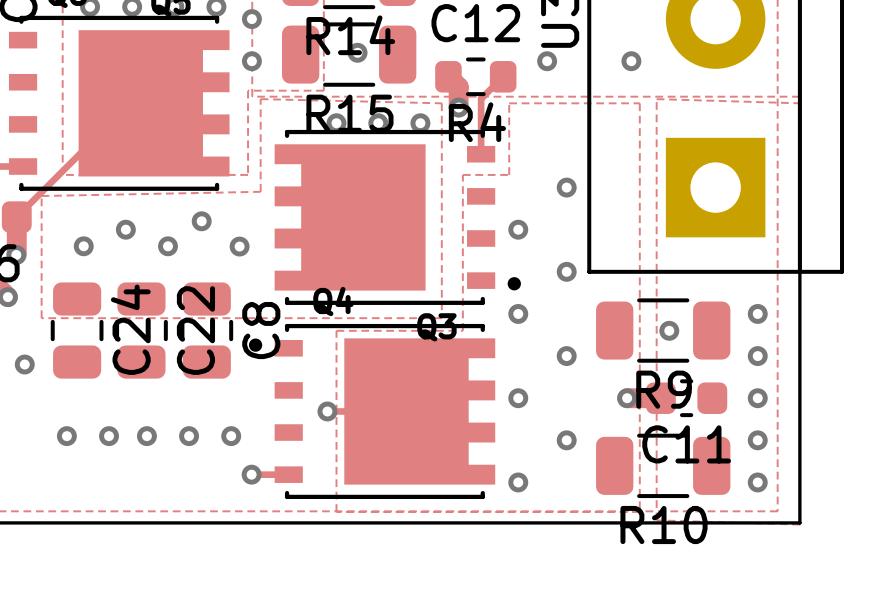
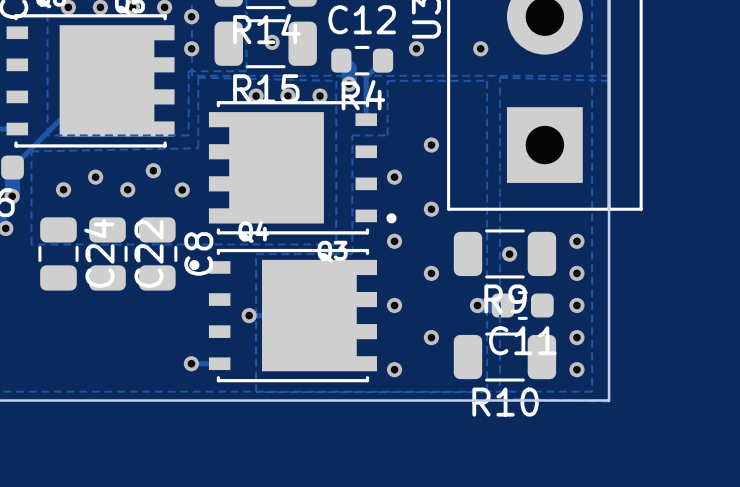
via: (24, 364) -> none
via: (66, 436) -> none
via: (109, 436) -> none
via: (146, 436) -> none
via: (189, 436) -> none
via: (231, 436) -> none

